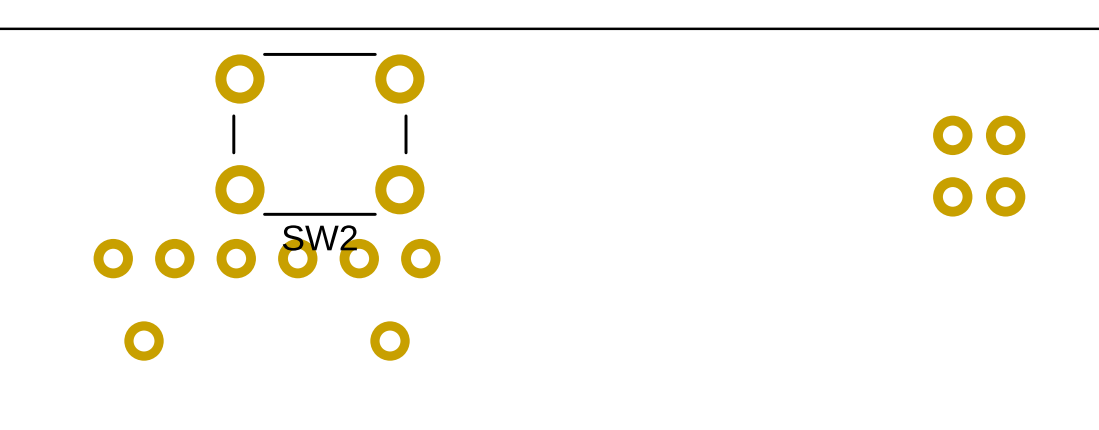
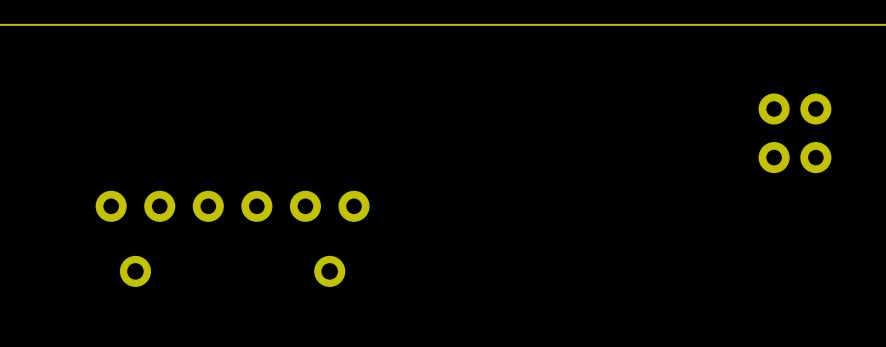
SW2: (319, 134) -> none

